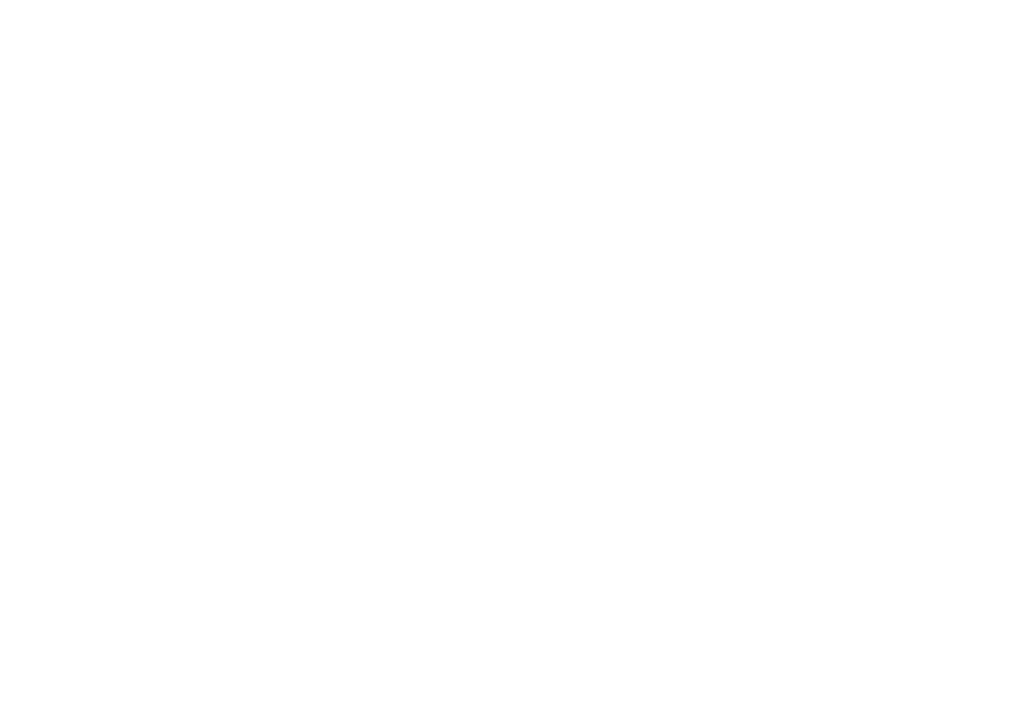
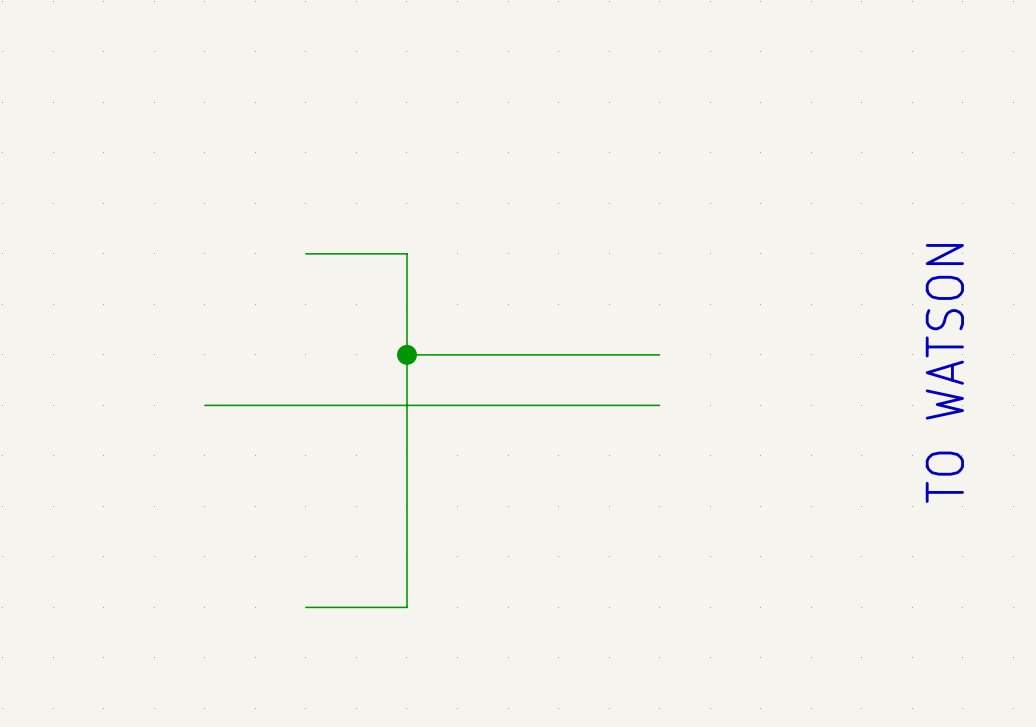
wire: none -> (305, 253) (406, 253) (406, 607) (305, 607)
wire: none -> (406, 354) (659, 354)
junction: none -> (406, 354)
text: none -> TO WATSON (944, 373)
wire: none -> (204, 405) (659, 405)

